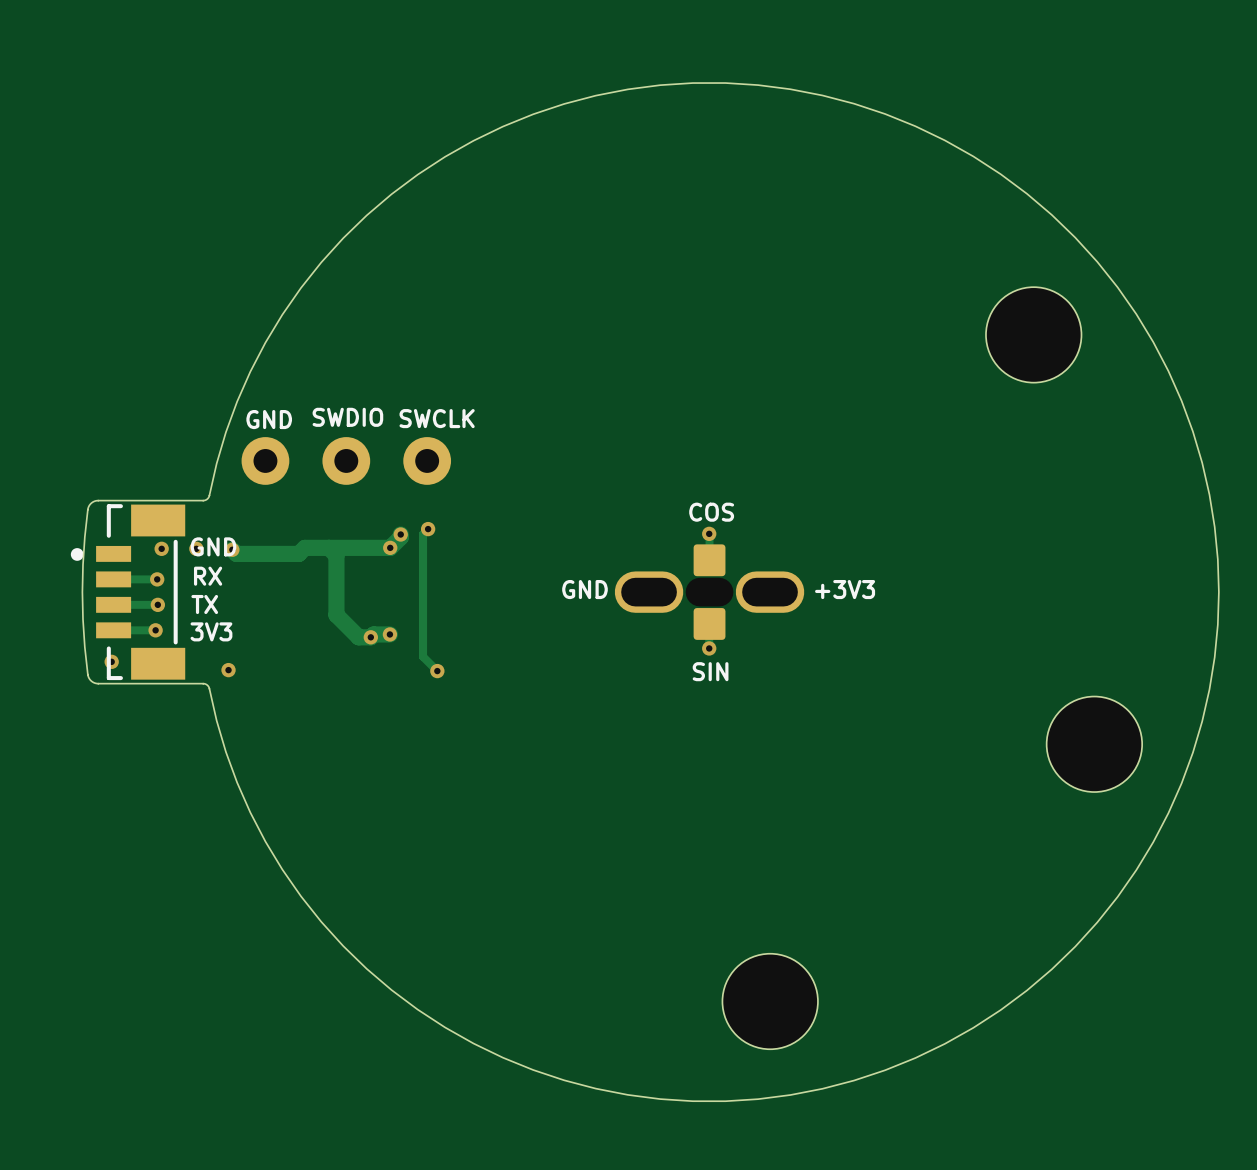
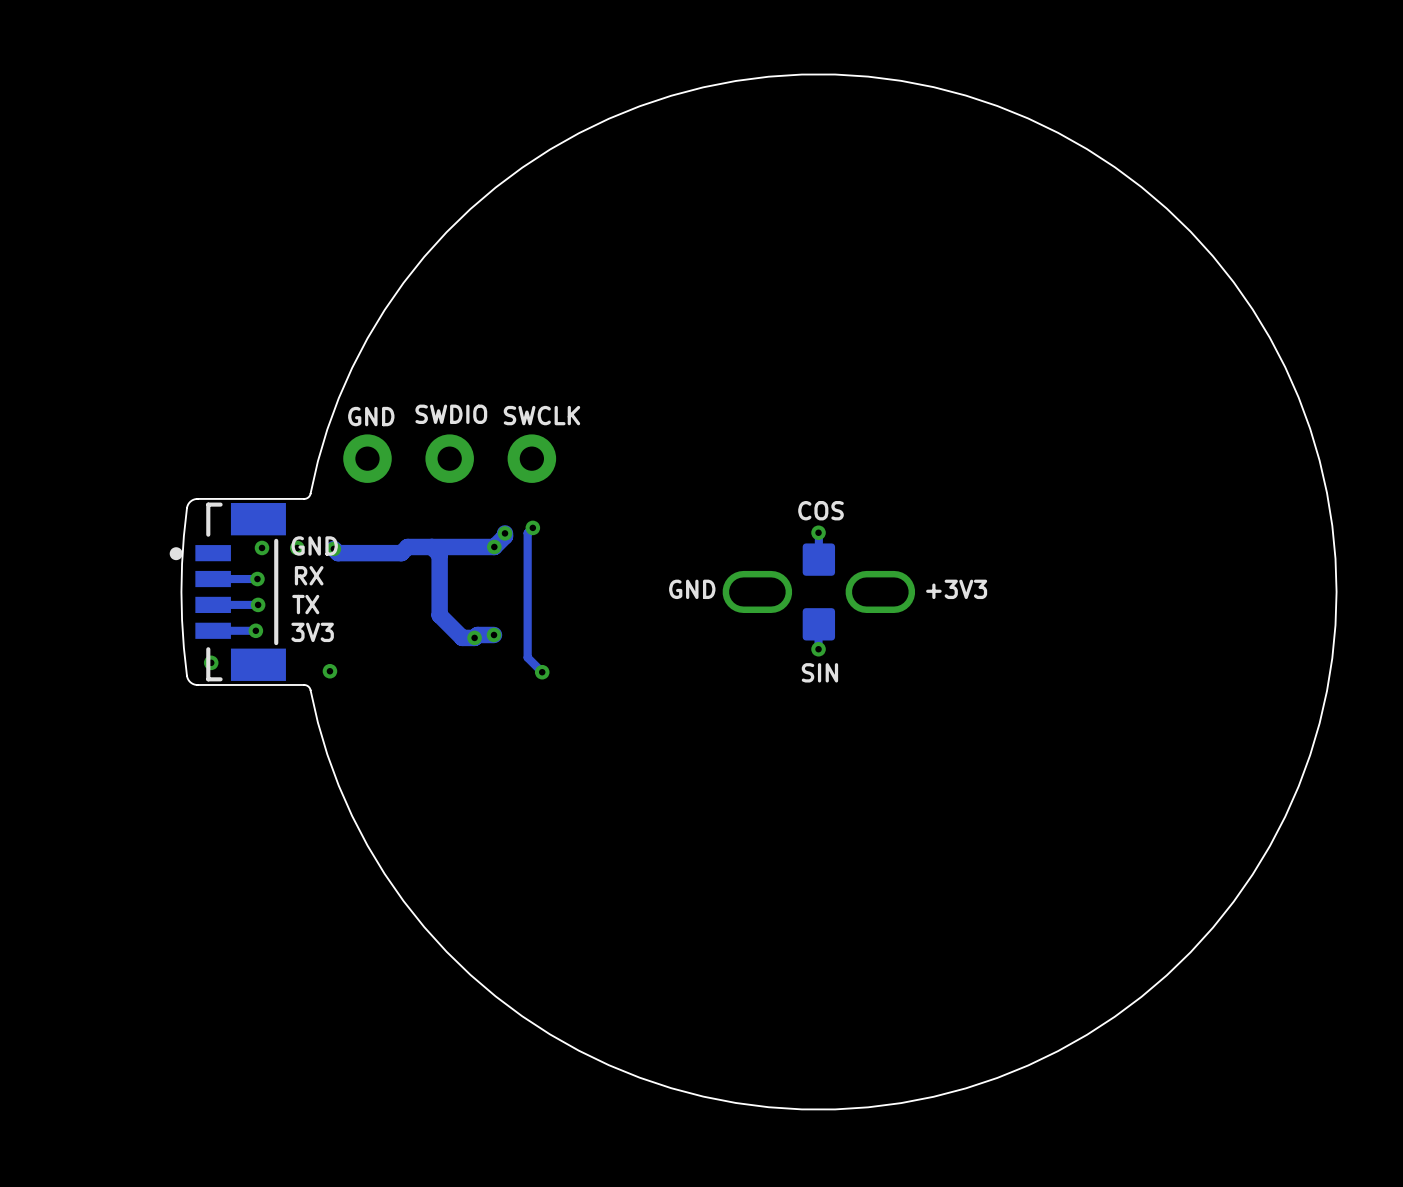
part: (1033, 334) -> none
part: (1094, 744) -> none
part: (770, 1001) -> none

